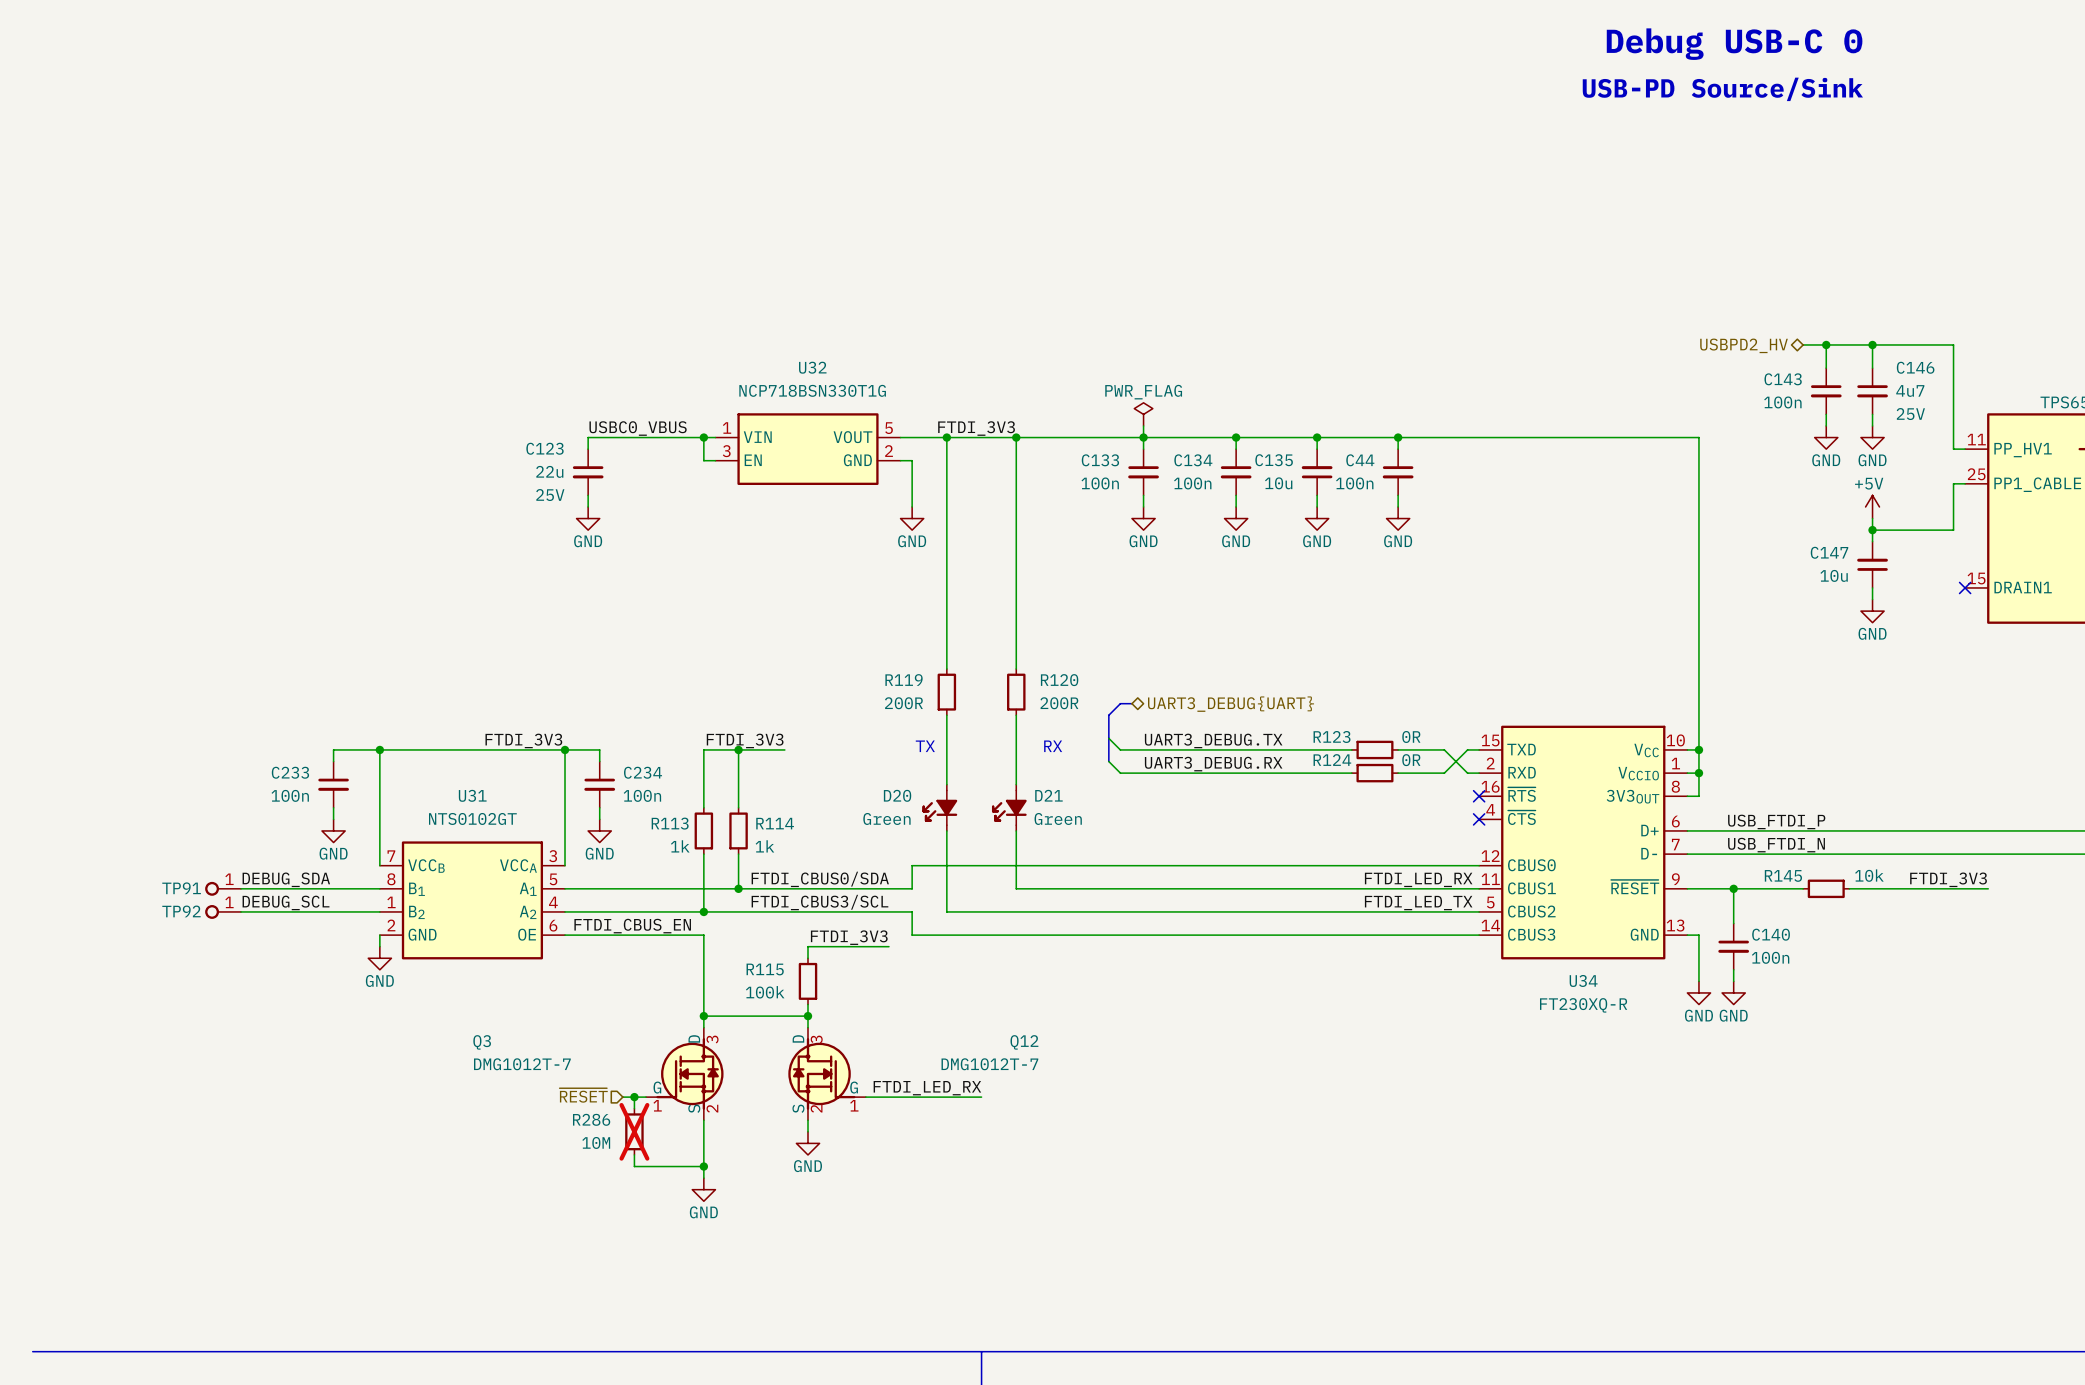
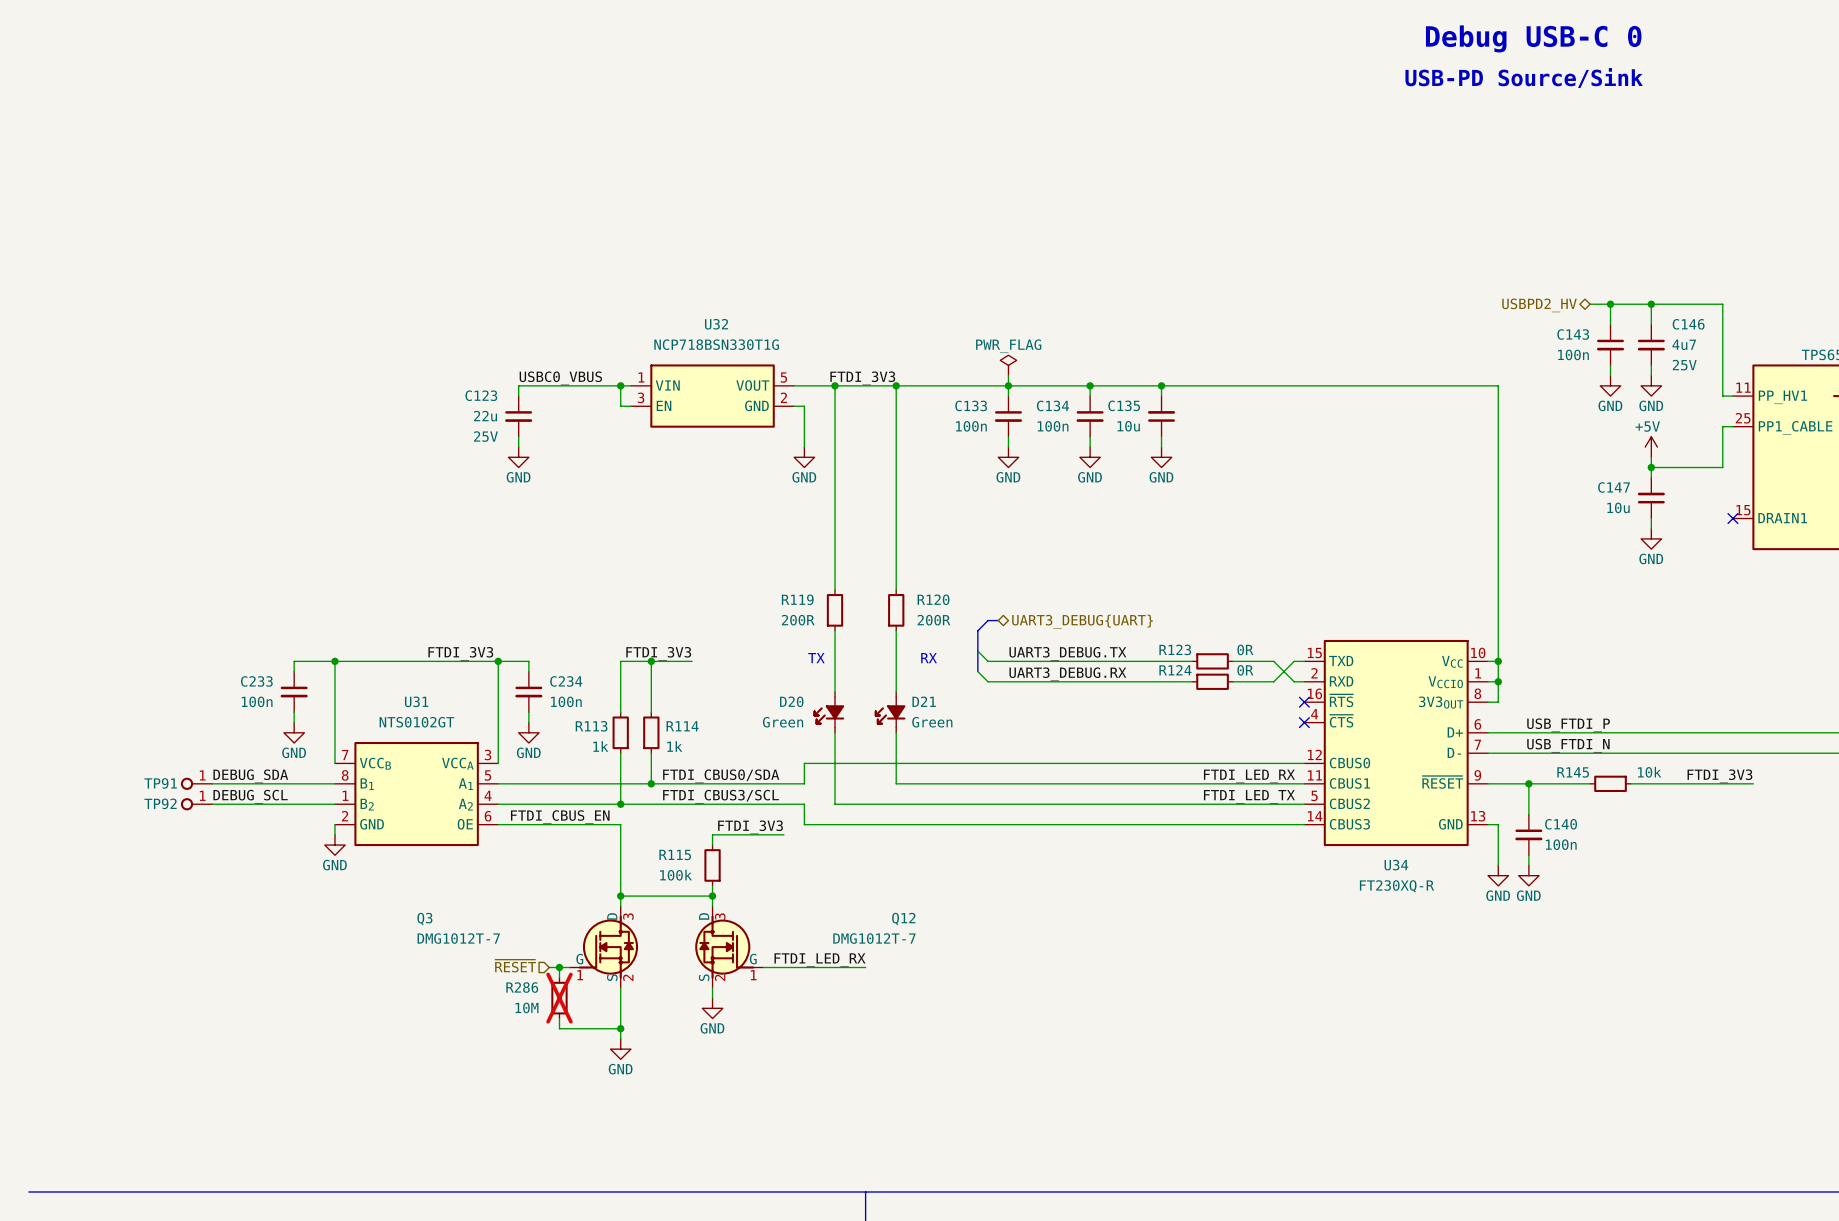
wire: (1398, 437) (1398, 449) -> none
junction: (1398, 437) -> none
C44: (1398, 472) -> none
wire: (1398, 495) (1398, 506) -> none
power symbol: GND (1398, 518) -> none

